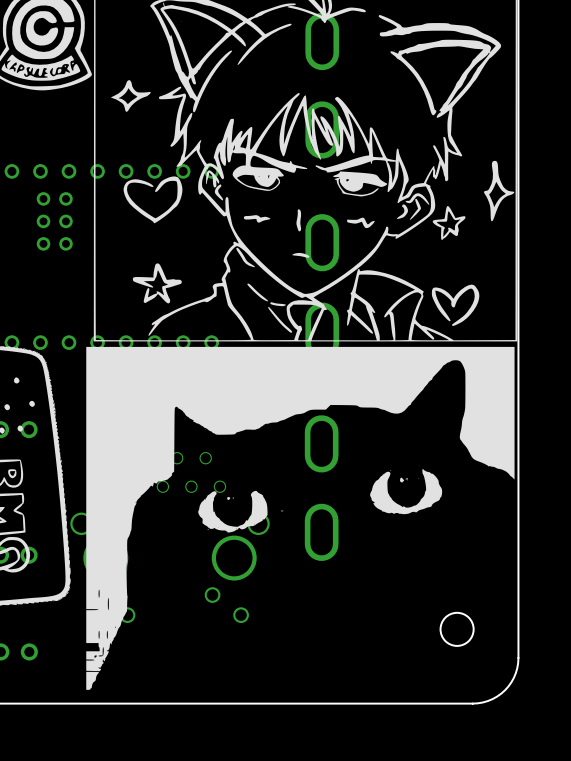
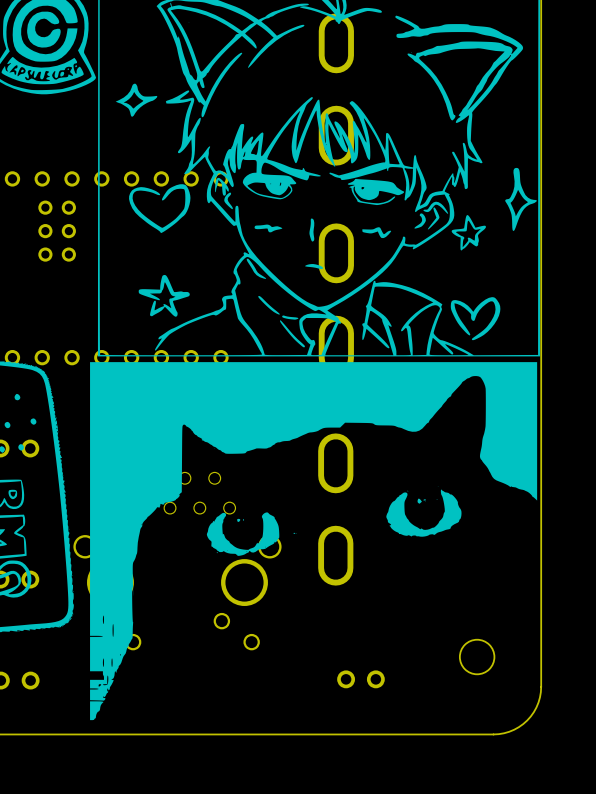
part: none -> (360, 679)

